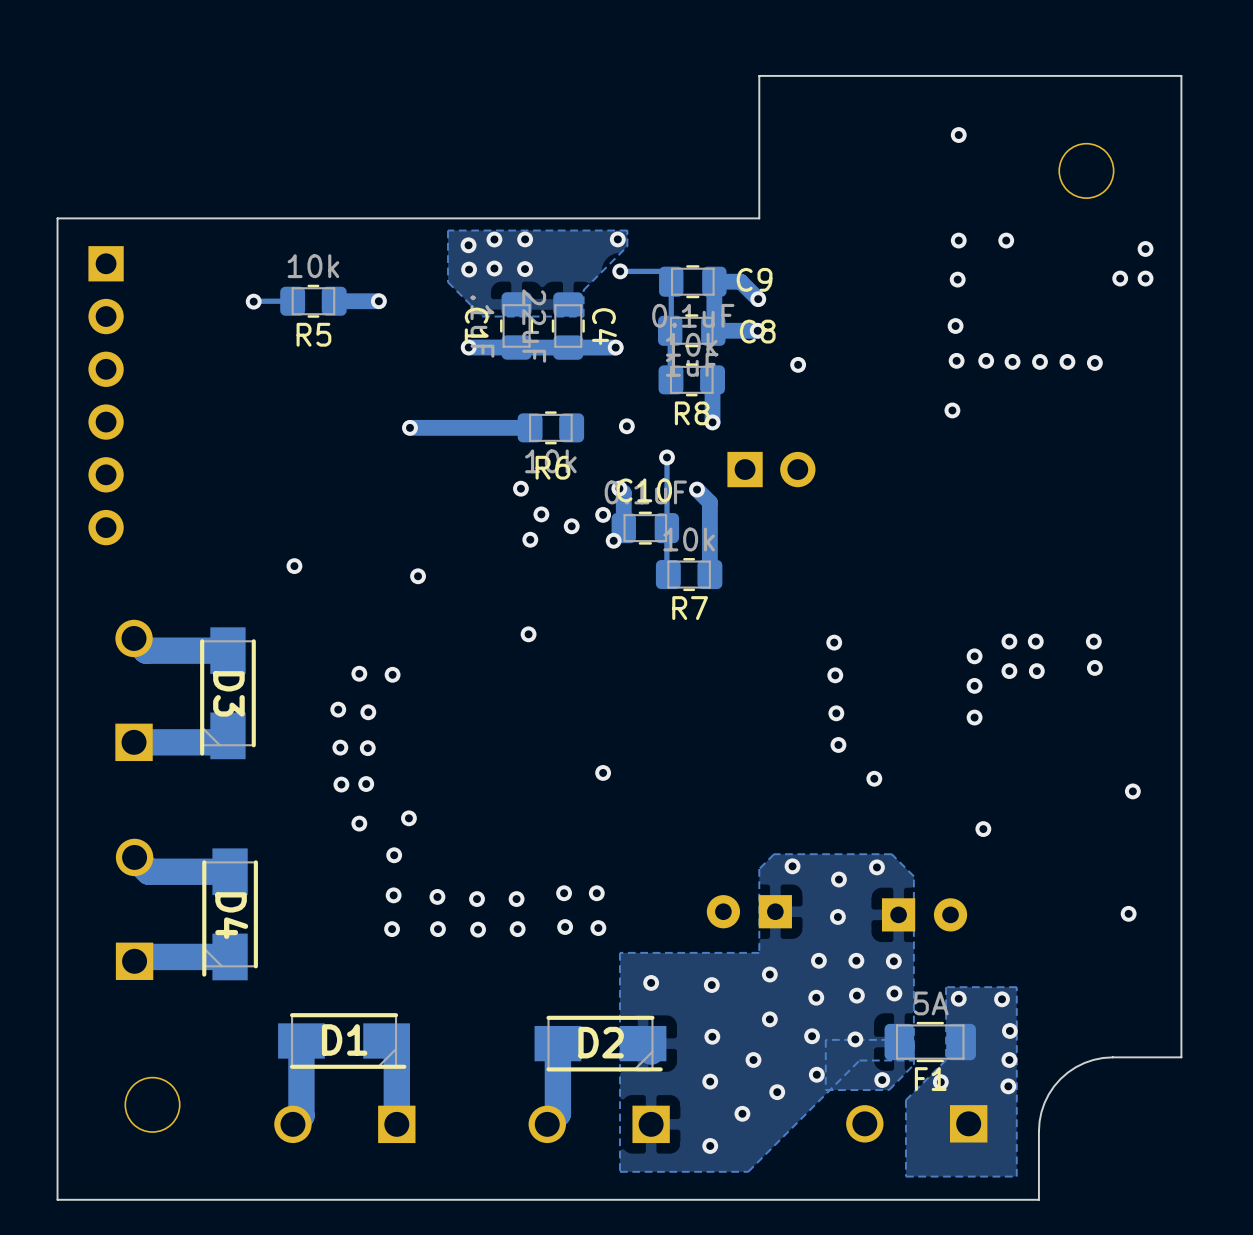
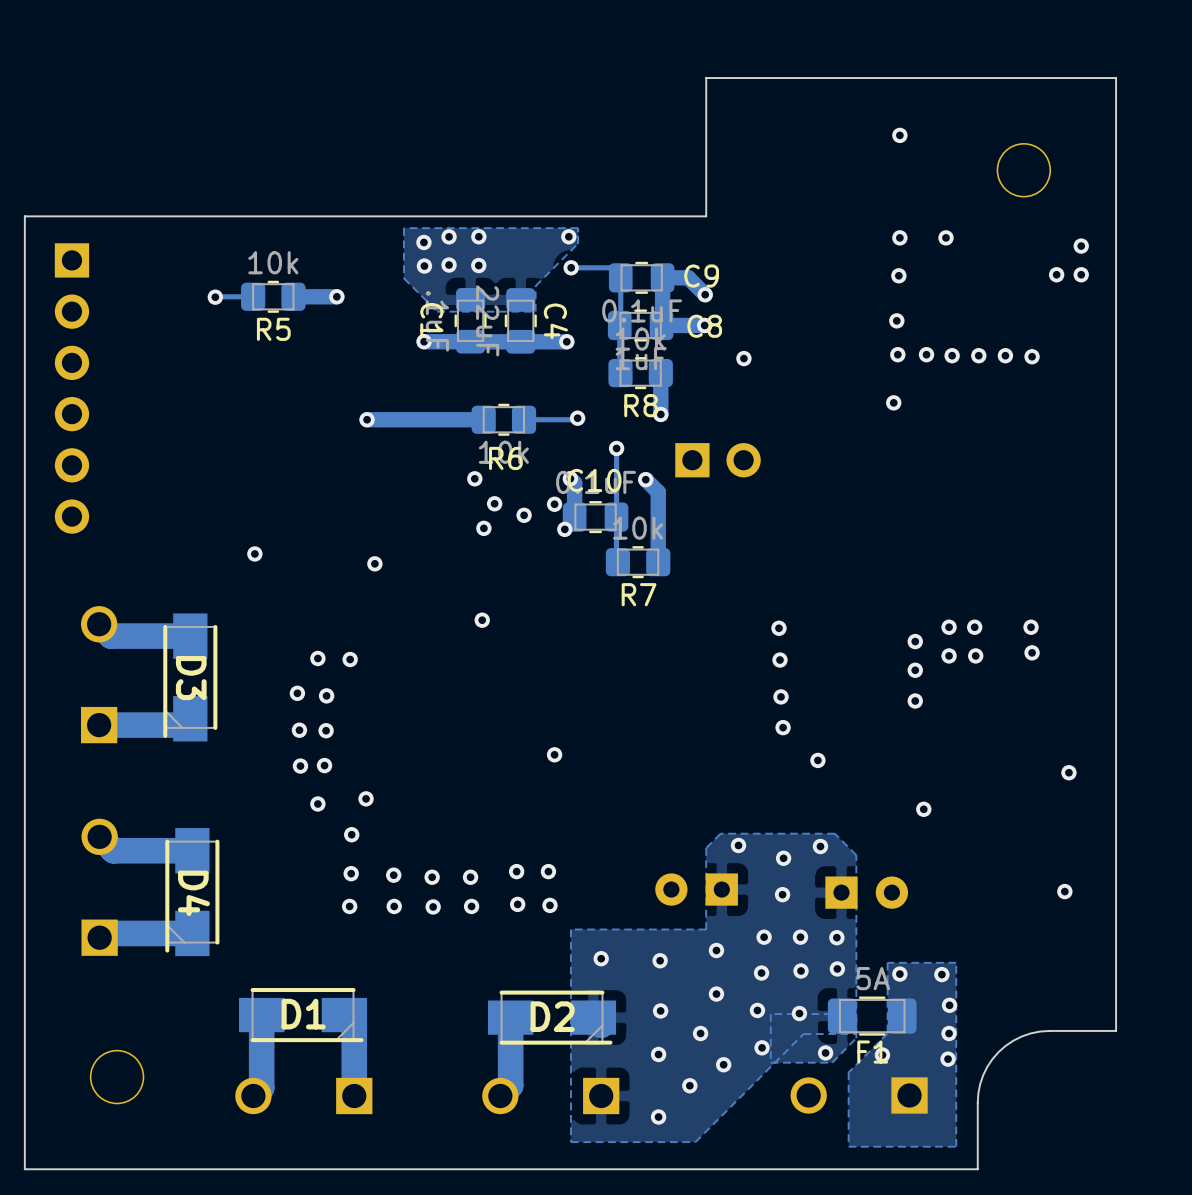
track: none -> (577, 418) (524, 419)

